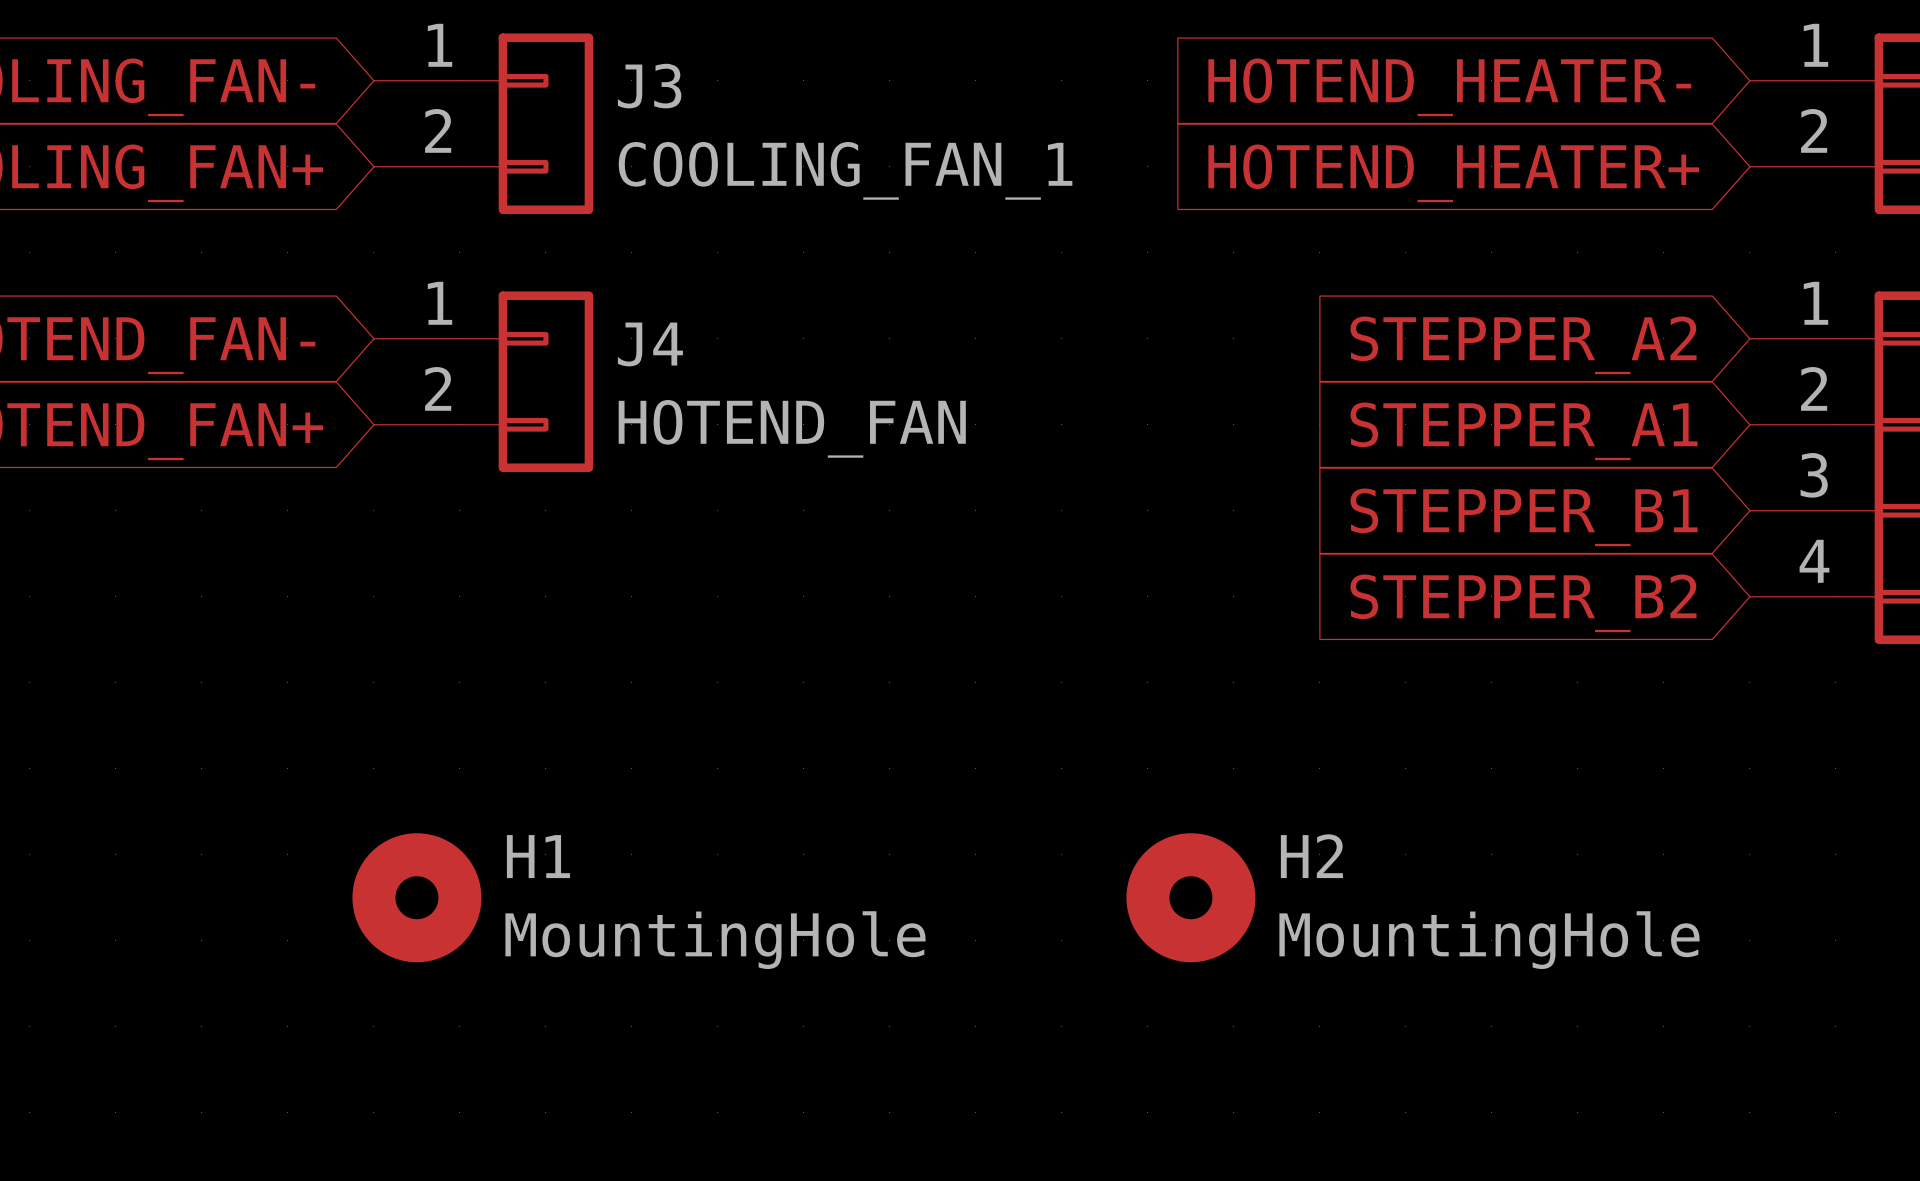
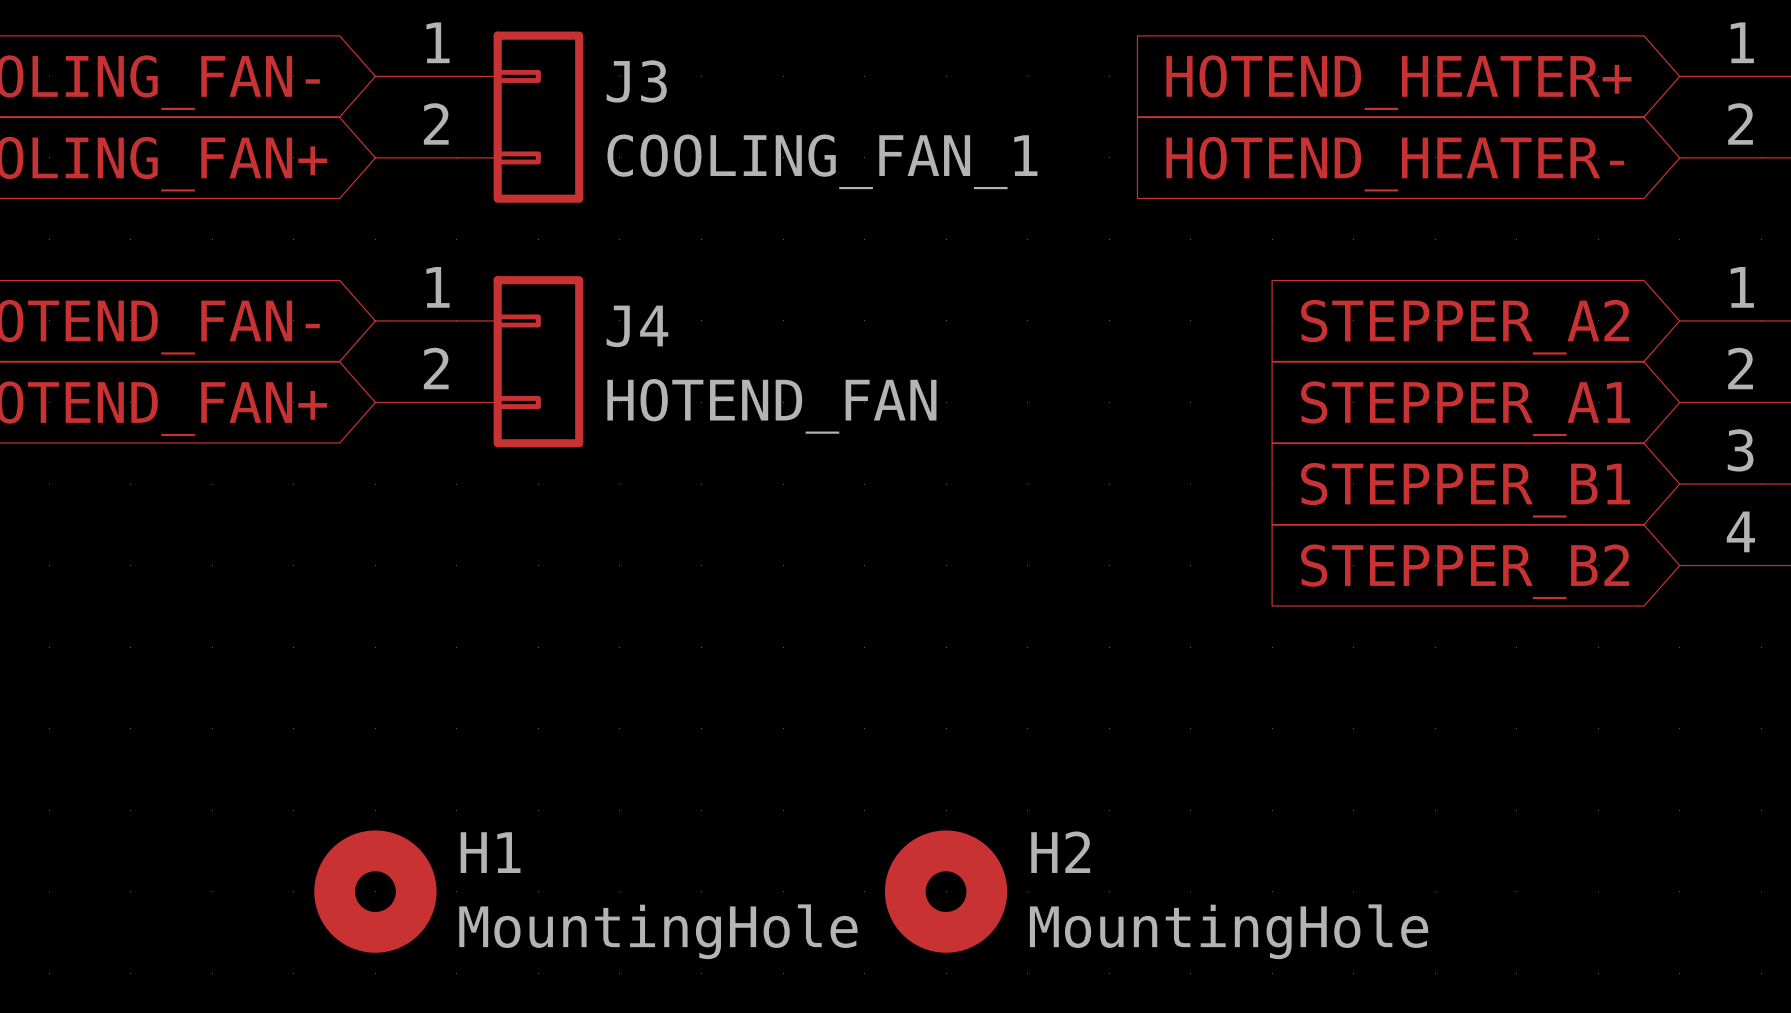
global label: HOTEND_HEATER- (1449, 87) -> HOTEND_HEATER+ (1398, 82)
global label: HOTEND_HEATER+ (1453, 173) -> HOTEND_HEATER- (1395, 164)
H1 position: (416, 897) -> (375, 891)
H2 position: (1190, 897) -> (946, 891)

